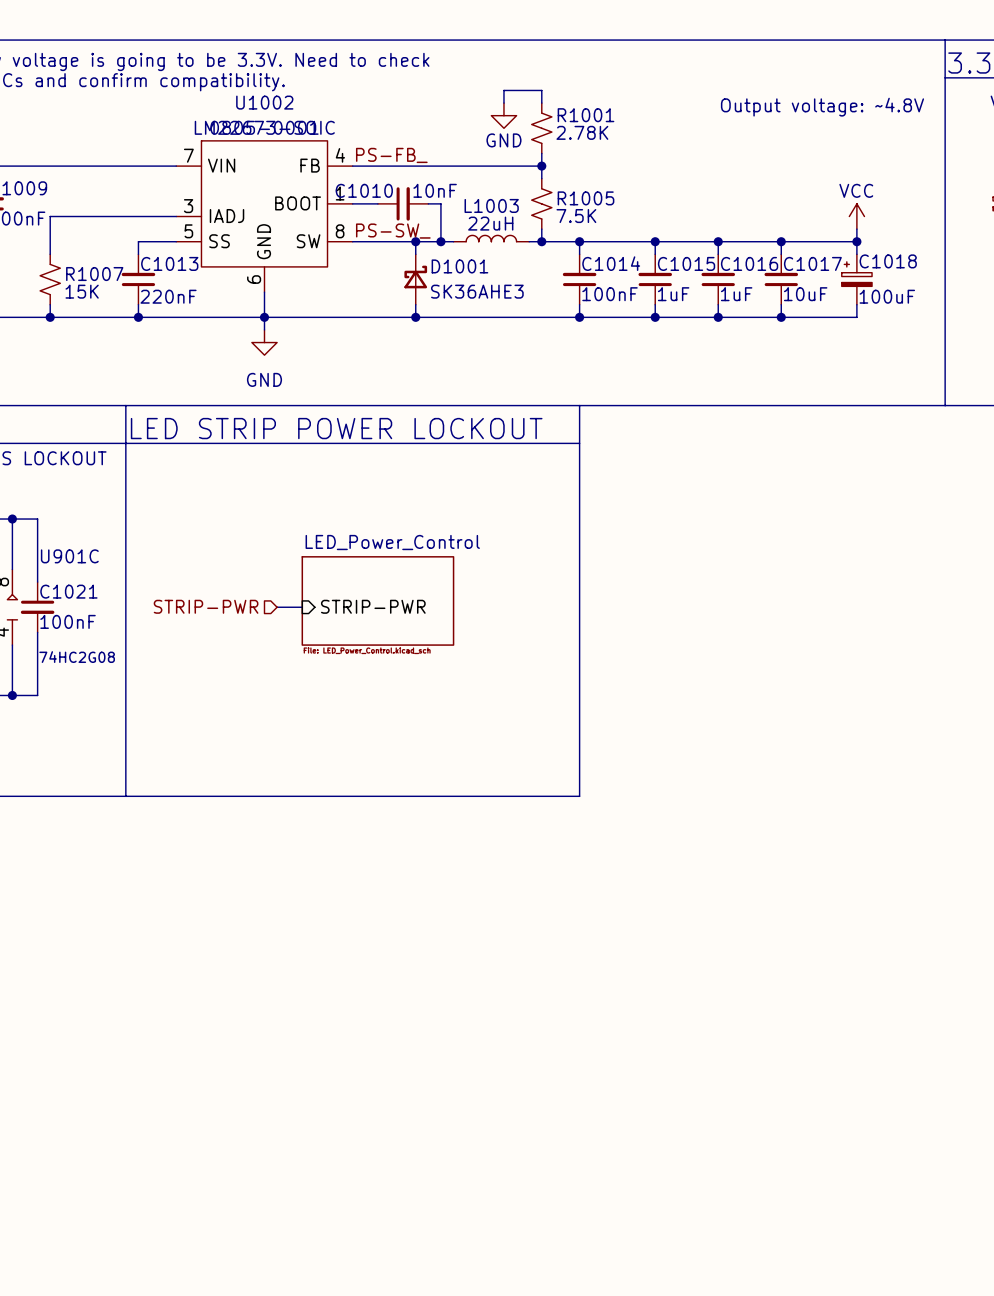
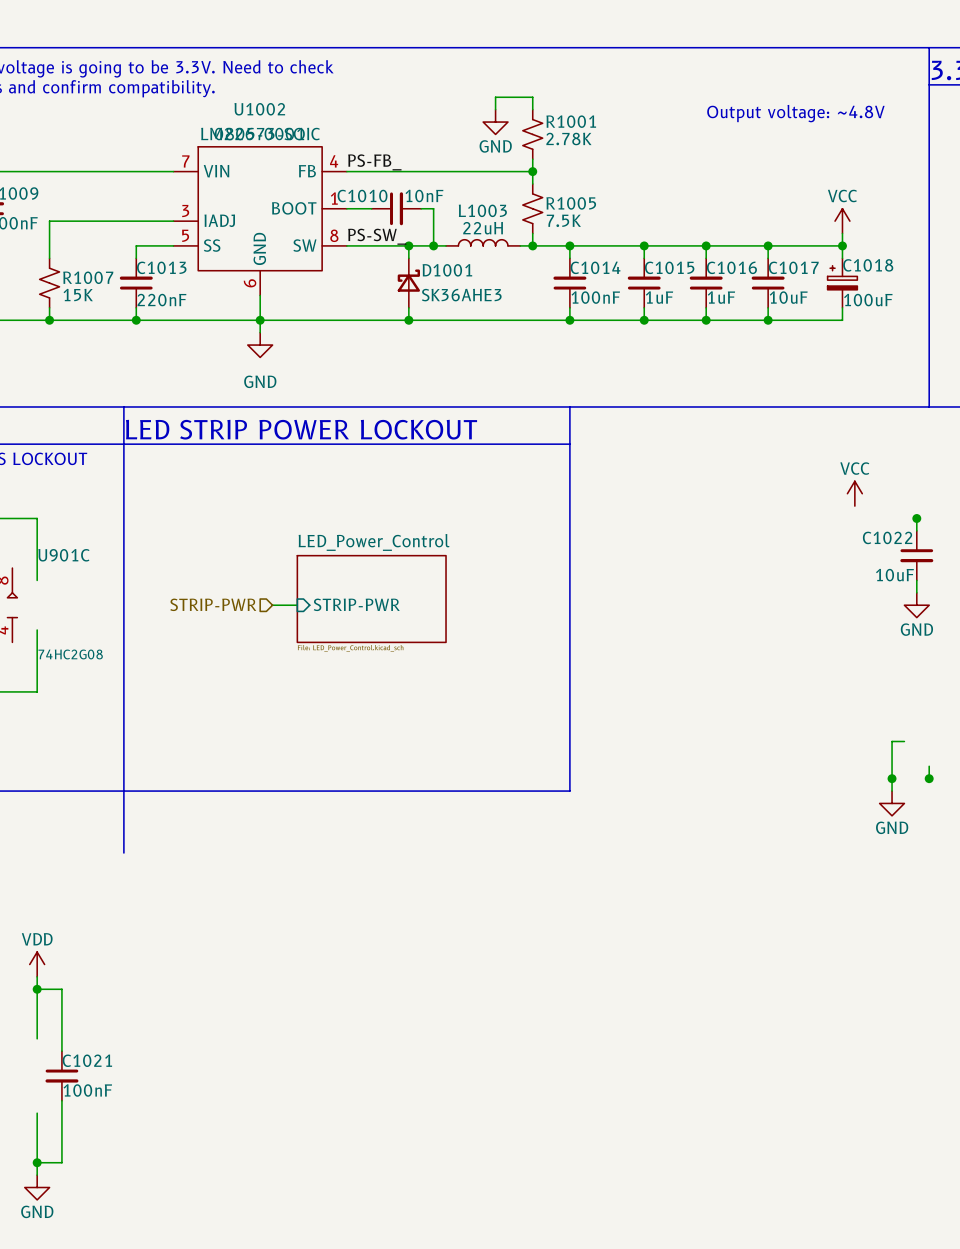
power symbol: none -> VCC (854, 493)
wire: (12, 519) (12, 569) -> none
junction: (12, 519) -> none
wire: none -> (916, 518) (916, 530)
junction: none -> (916, 518)
C1022: none -> 10uF (916, 555)
wire: none -> (916, 580) (916, 592)
C1021 position: (37, 607) -> (61, 1076)
power symbol: none -> GND (916, 605)
wire: (12, 645) (12, 695) -> none
junction: (12, 695) -> none
wire: none -> (904, 741) (892, 741) (892, 791)
wire: none -> (929, 766) (929, 778)
junction: none -> (892, 778)
junction: none -> (929, 778)
line: none -> (123, 791) (123, 853)
power symbol: none -> GND (892, 803)
power symbol: none -> VDD (37, 964)
wire: none -> (37, 976) (37, 1038)
wire: none -> (37, 989) (61, 989) (61, 1051)
junction: none -> (37, 989)
wire: none -> (61, 1100) (61, 1162) (37, 1162)
wire: none -> (37, 1113) (37, 1175)
junction: none -> (37, 1162)
power symbol: none -> GND (37, 1187)

